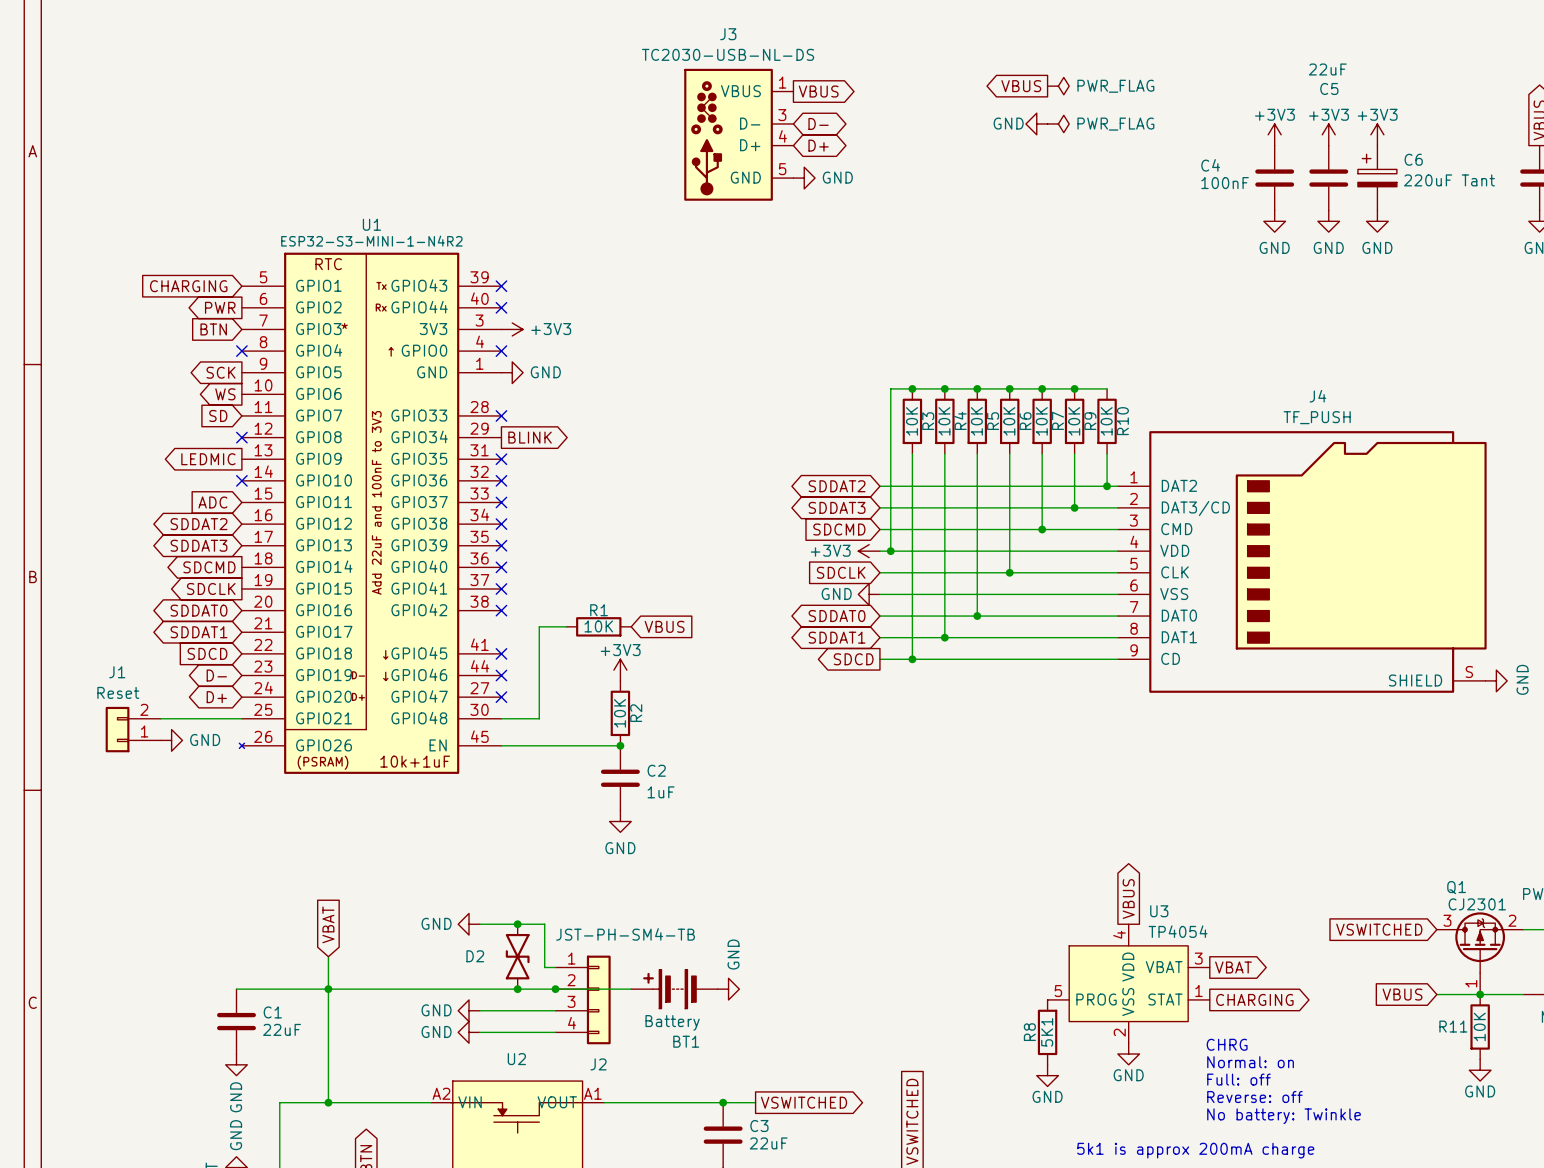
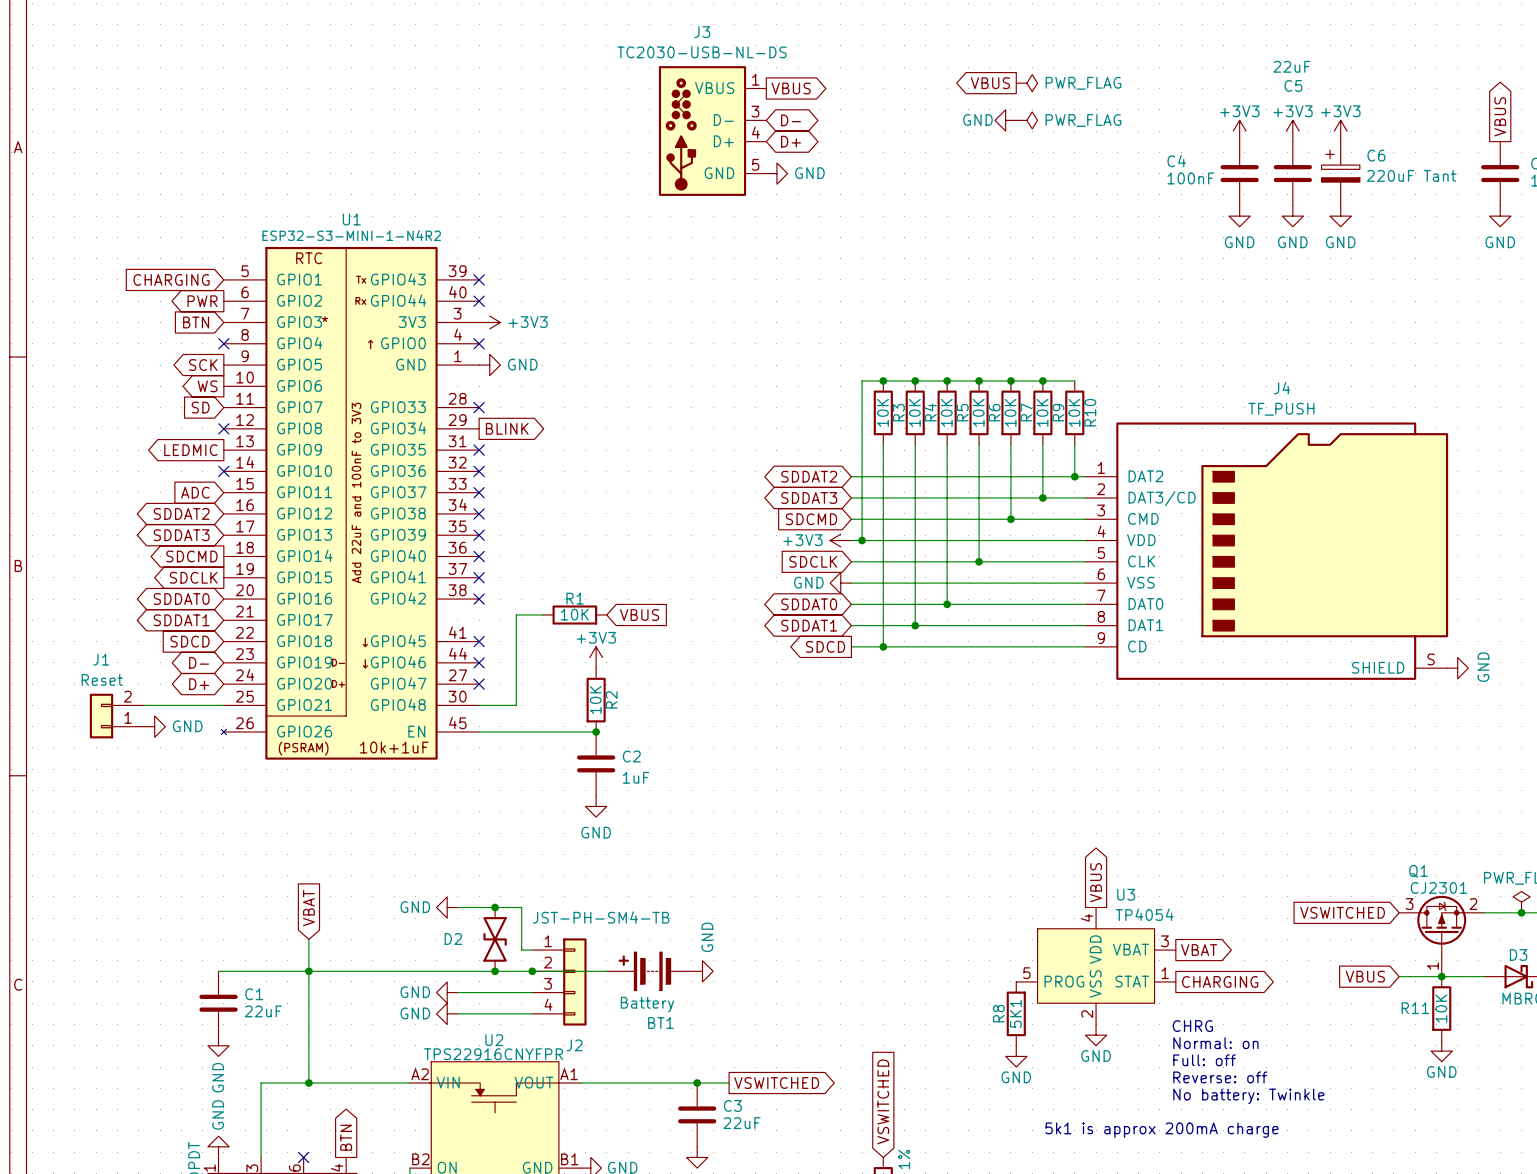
U2 value: none -> TPS22916CNYFPR (493, 1054)

